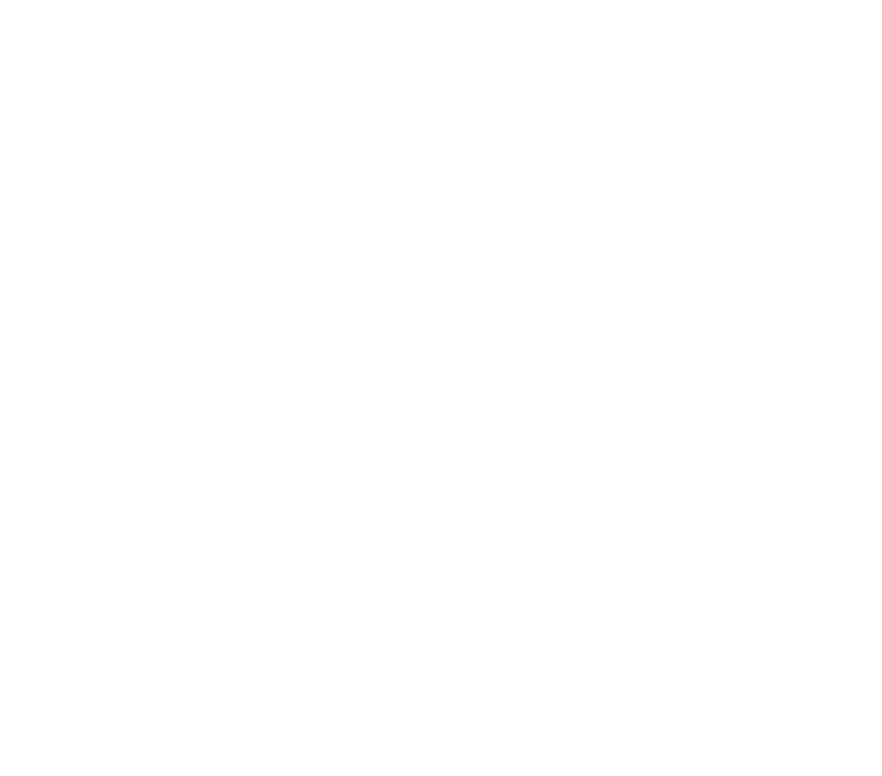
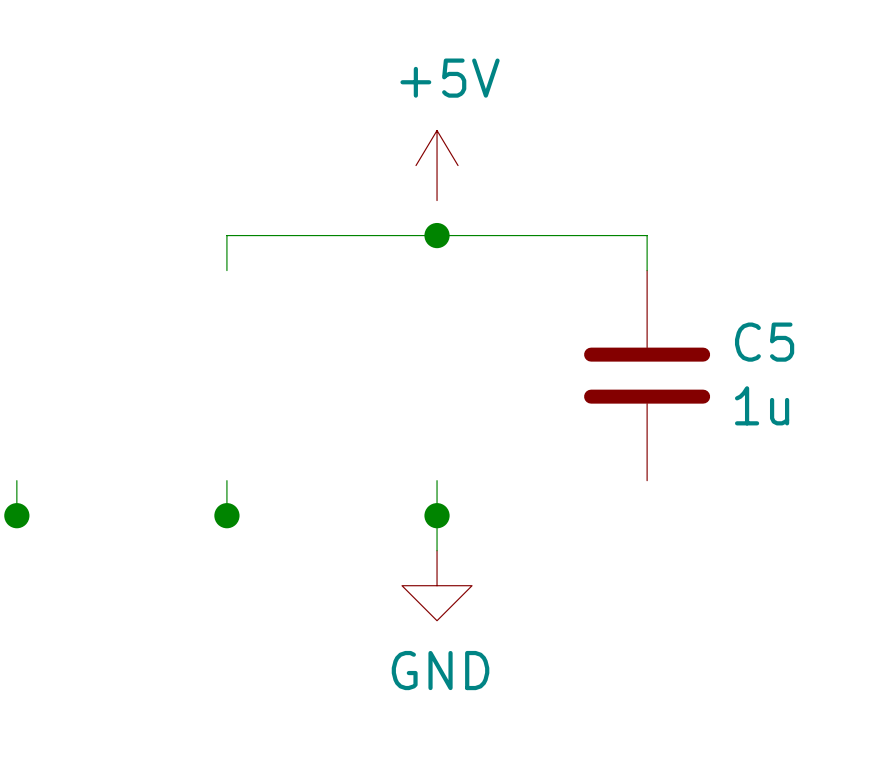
power symbol: none -> +5V (437, 165)
junction: none -> (437, 235)
wire: none -> (226, 270) (226, 235) (647, 235) (647, 270)
C5: none -> 1u (647, 375)
wire: none -> (16, 480) (16, 515)
wire: none -> (226, 480) (226, 515)
wire: none -> (437, 480) (437, 550)
junction: none -> (16, 515)
junction: none -> (226, 515)
junction: none -> (437, 515)
power symbol: none -> GND (437, 585)

